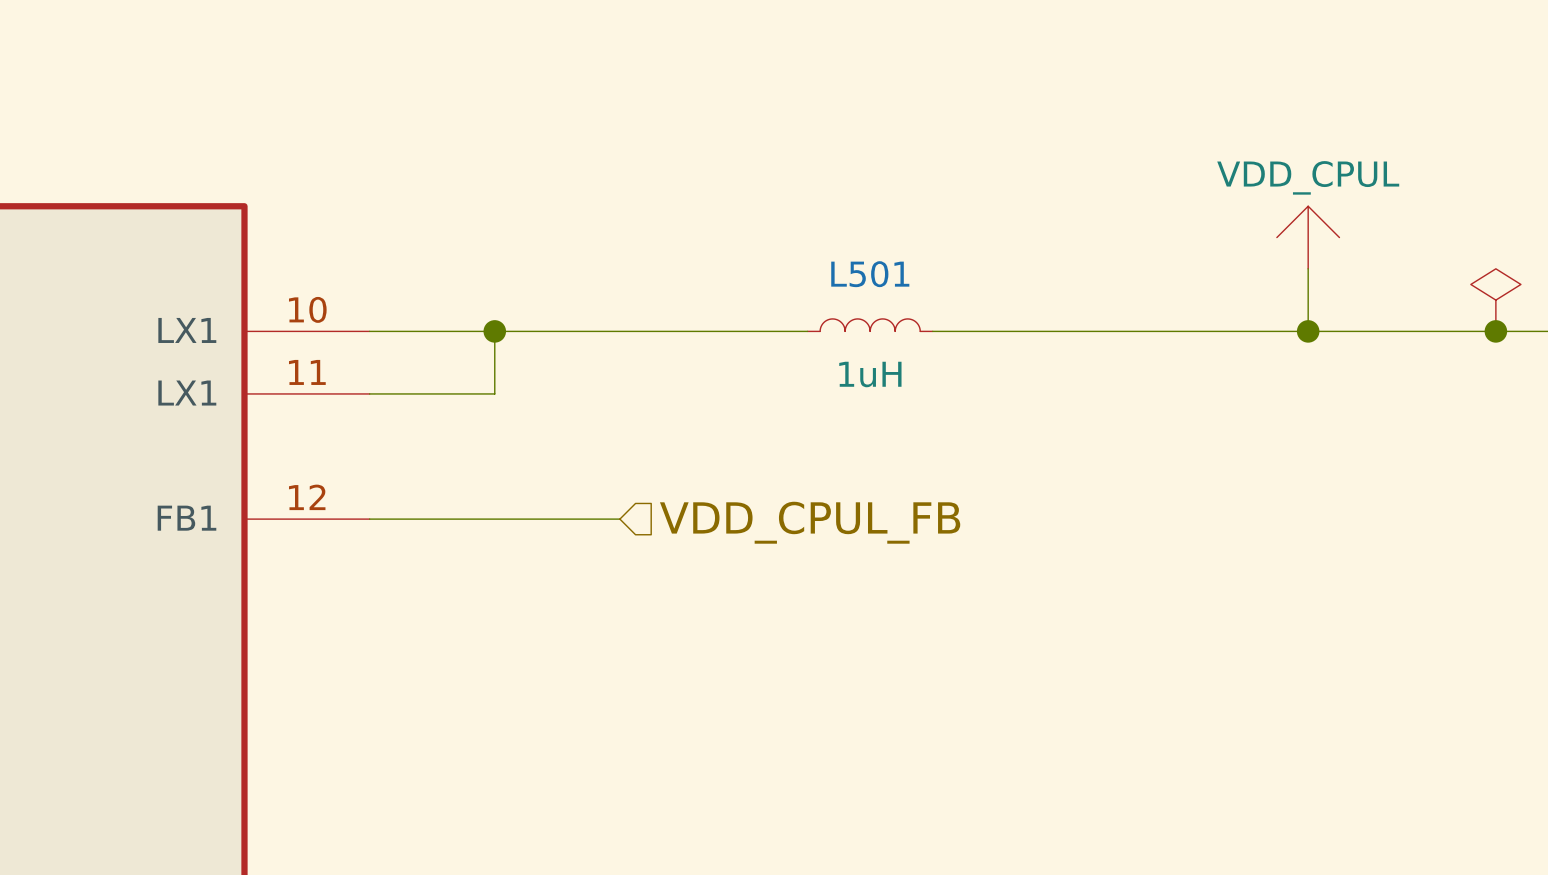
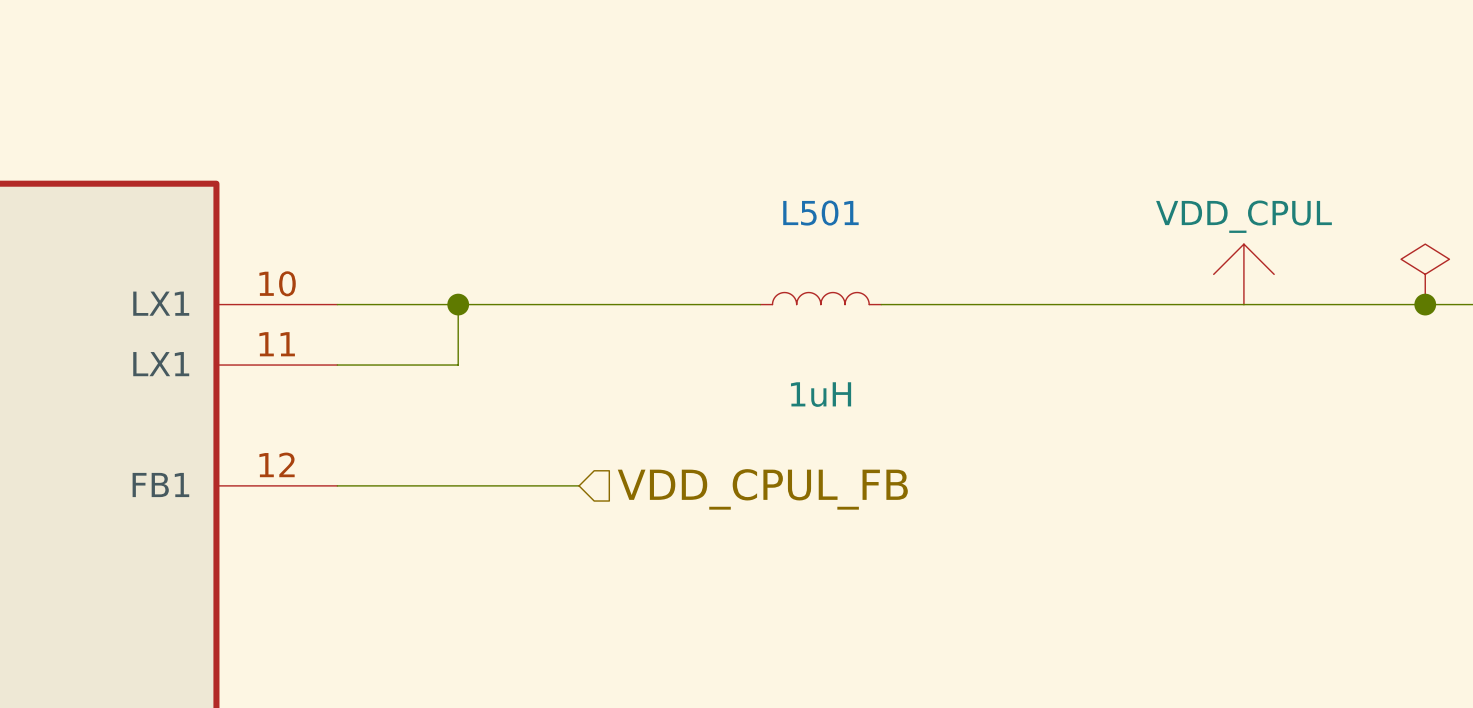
power symbol position: VDD_CPUL (1308, 237) -> VDD_CPUL (1243, 274)
L501 name position: L501 (870, 274) -> L501 (820, 213)
junction: (1308, 331) -> none
L501 value position: 1uH (870, 374) -> 1uH (821, 394)

